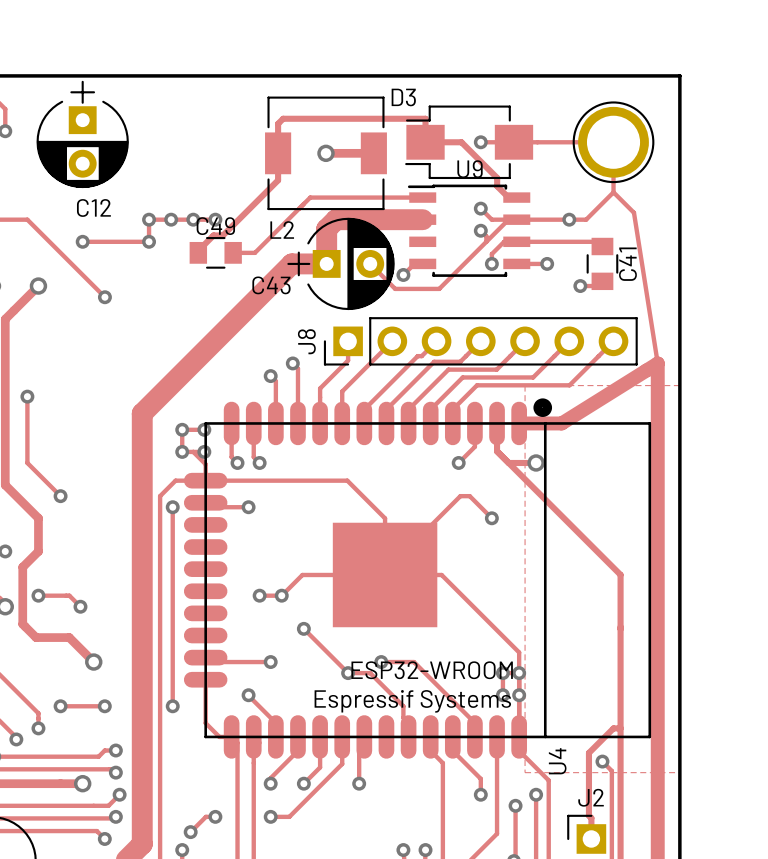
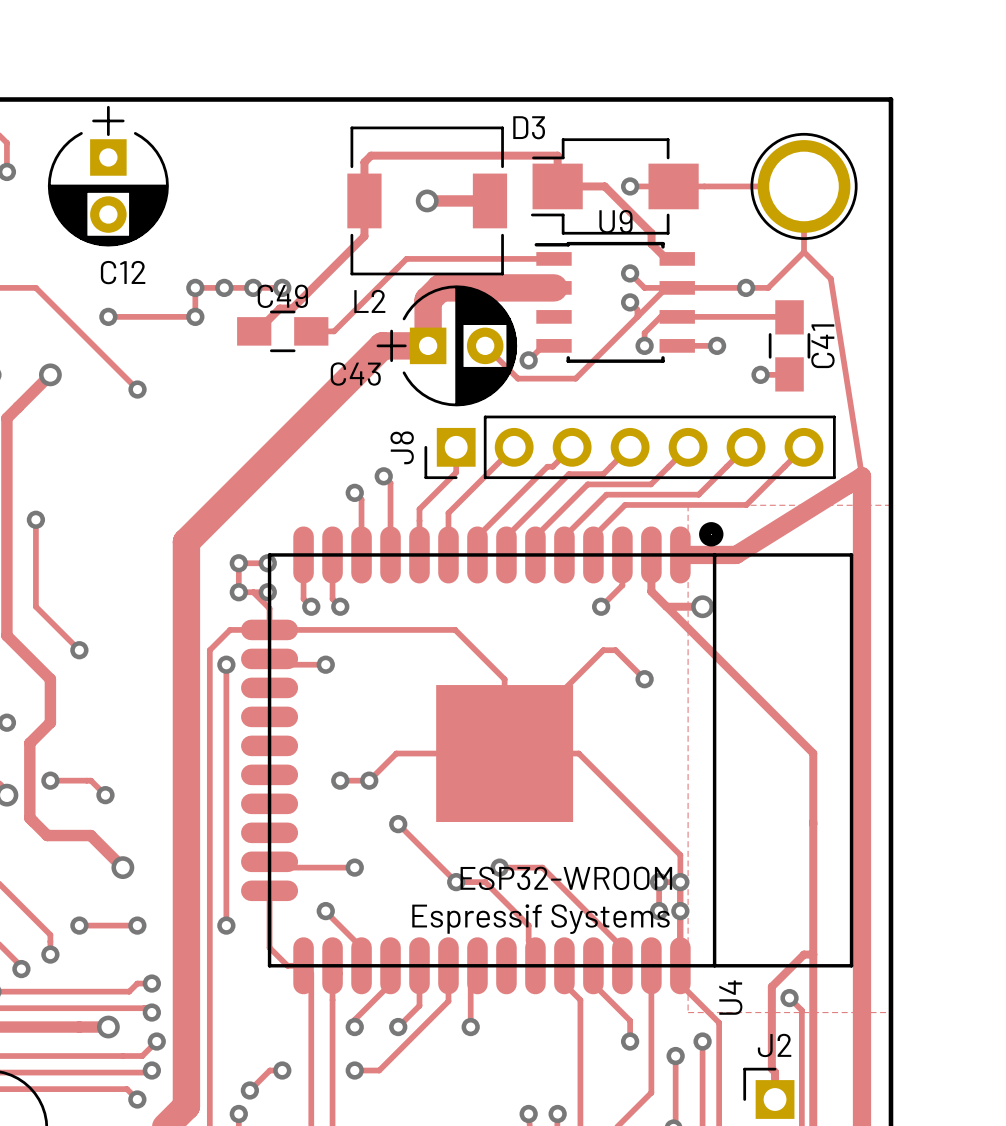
C49 footprint: [189, 237, 242, 269] -> [237, 310, 329, 353]
C41 footprint: [586, 237, 619, 291] -> [768, 300, 811, 392]

